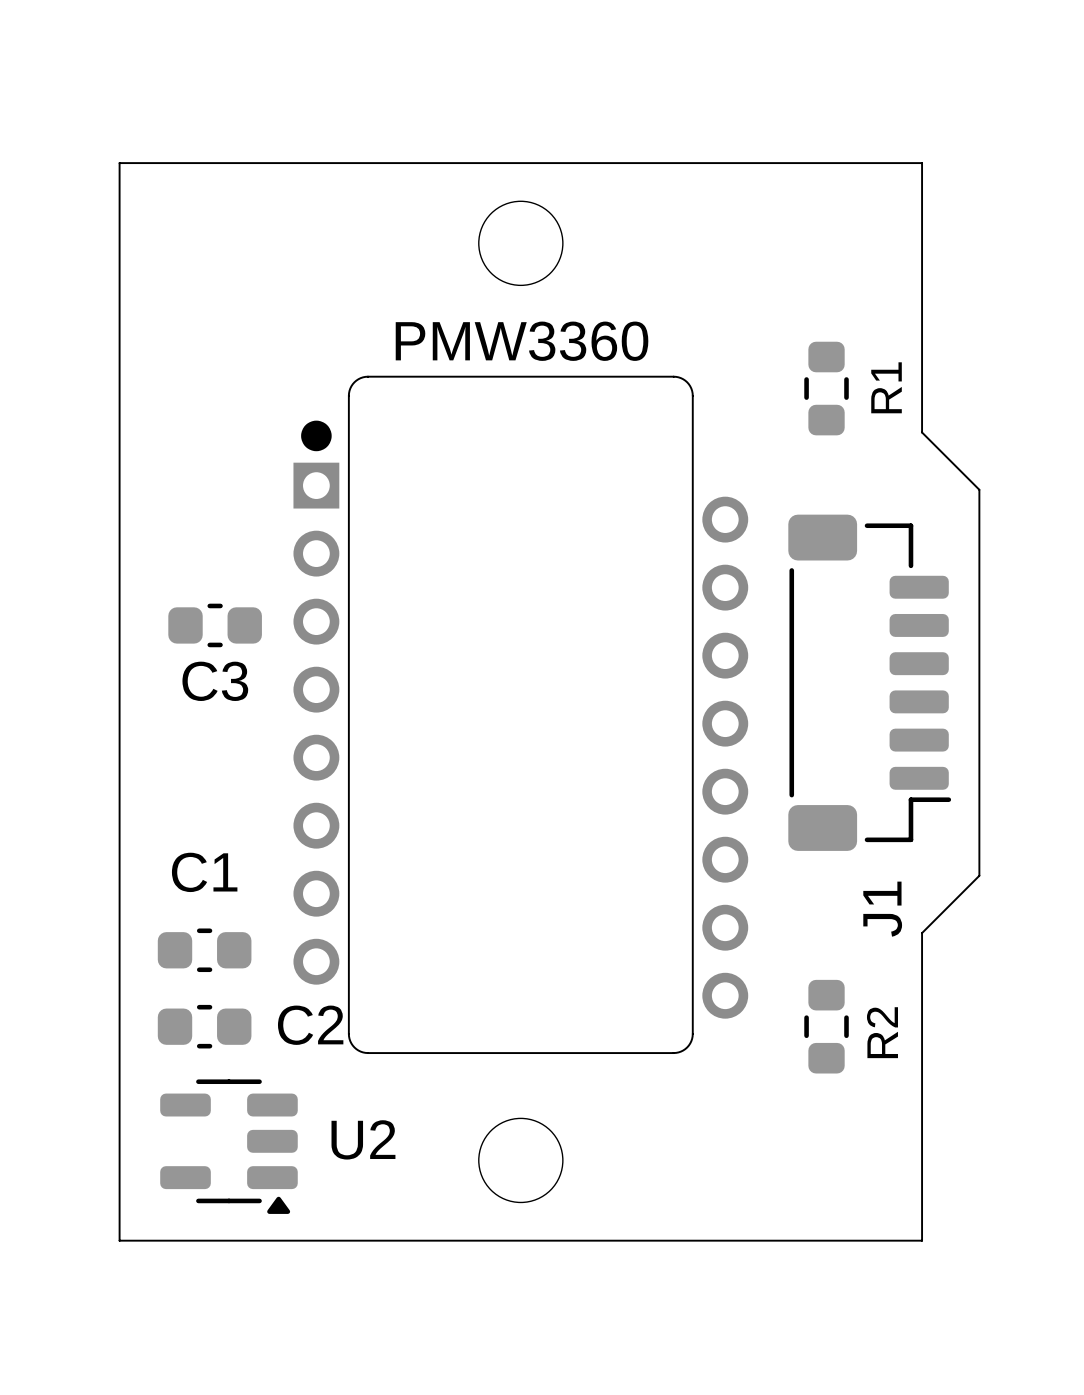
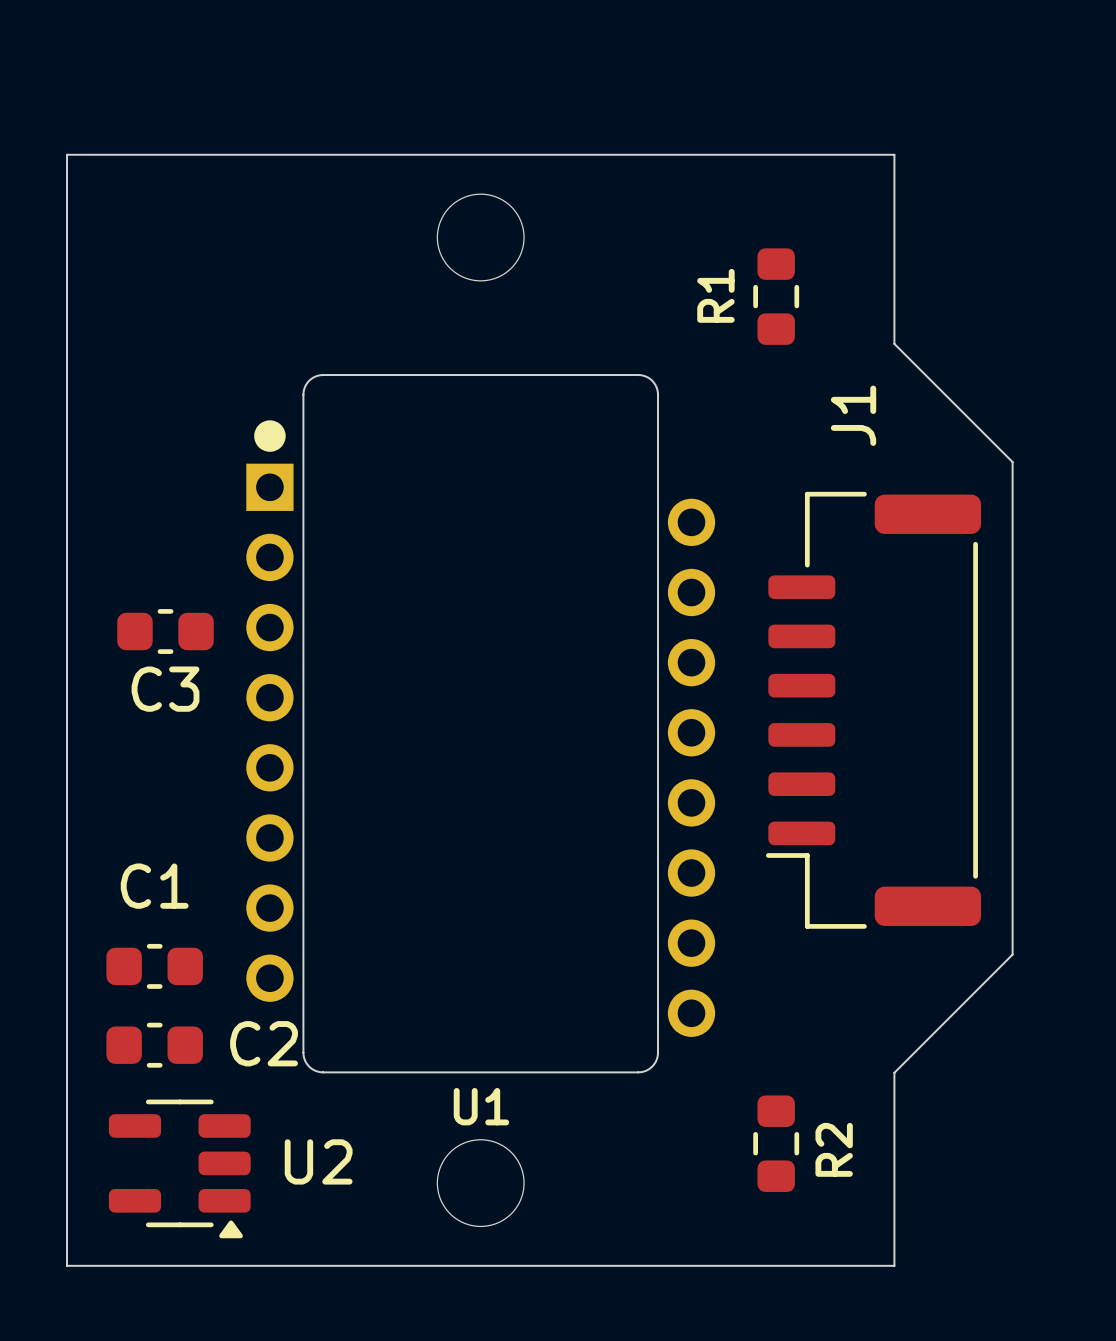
U1 value: PMW3360 (522, 341) -> none
board edge: (922, 346) (922, 432) (979, 489) (979, 875) (922, 933) (922, 1053) -> (894, 343) (1012, 462) (1012, 954) (894, 1072)
R1 name position: R1 (886, 387) -> R1 (715, 295)
R1 position: (826, 388) -> (776, 296)
J1 footprint: [788, 514, 952, 851] -> [765, 491, 982, 929]
J1 name position: J1 (882, 909) -> J1 (853, 415)
R2 position: (826, 1026) -> (776, 1143)
U1 name: none -> U1 (481, 1106)

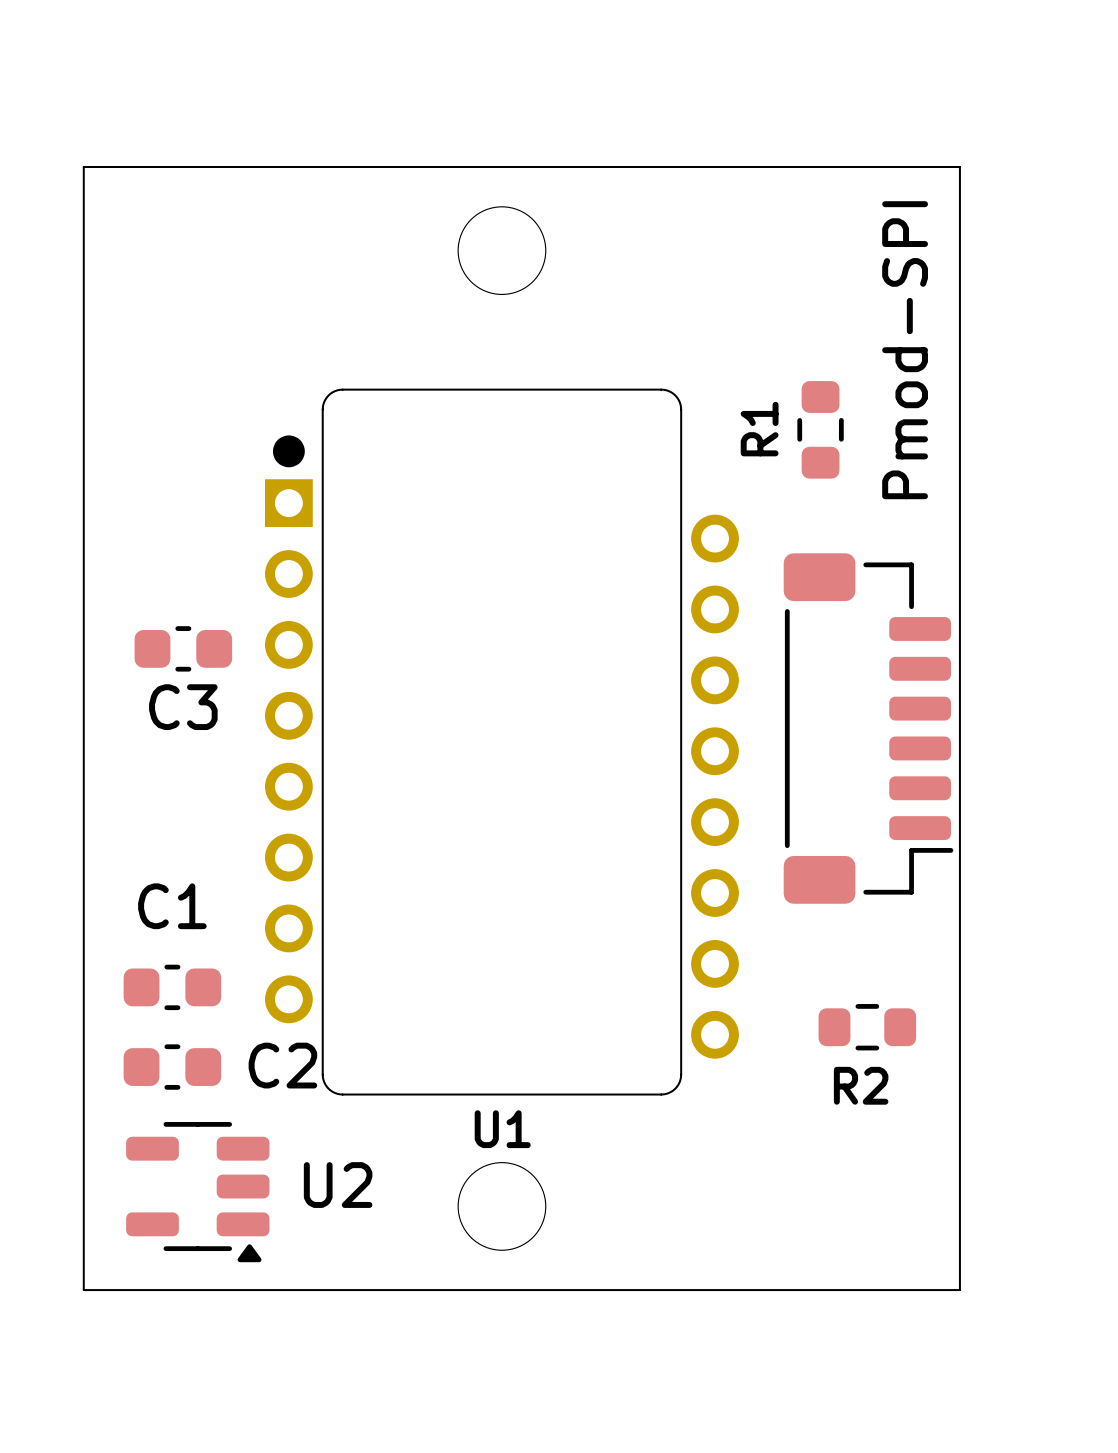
board edge: (894, 154) (894, 343) (1012, 462) (1012, 954) (894, 1072) (894, 1265) -> (920, 167) (959, 167) (959, 1290) (920, 1290)
R1 position: (776, 296) -> (820, 429)
Pmod-SPI: none -> (868, 728)
J1: (873, 710) -> none
R2 rotation: 0° (776, 1143) -> 90° clockwise (867, 1027)
R2 position: (776, 1143) -> (867, 1027)

